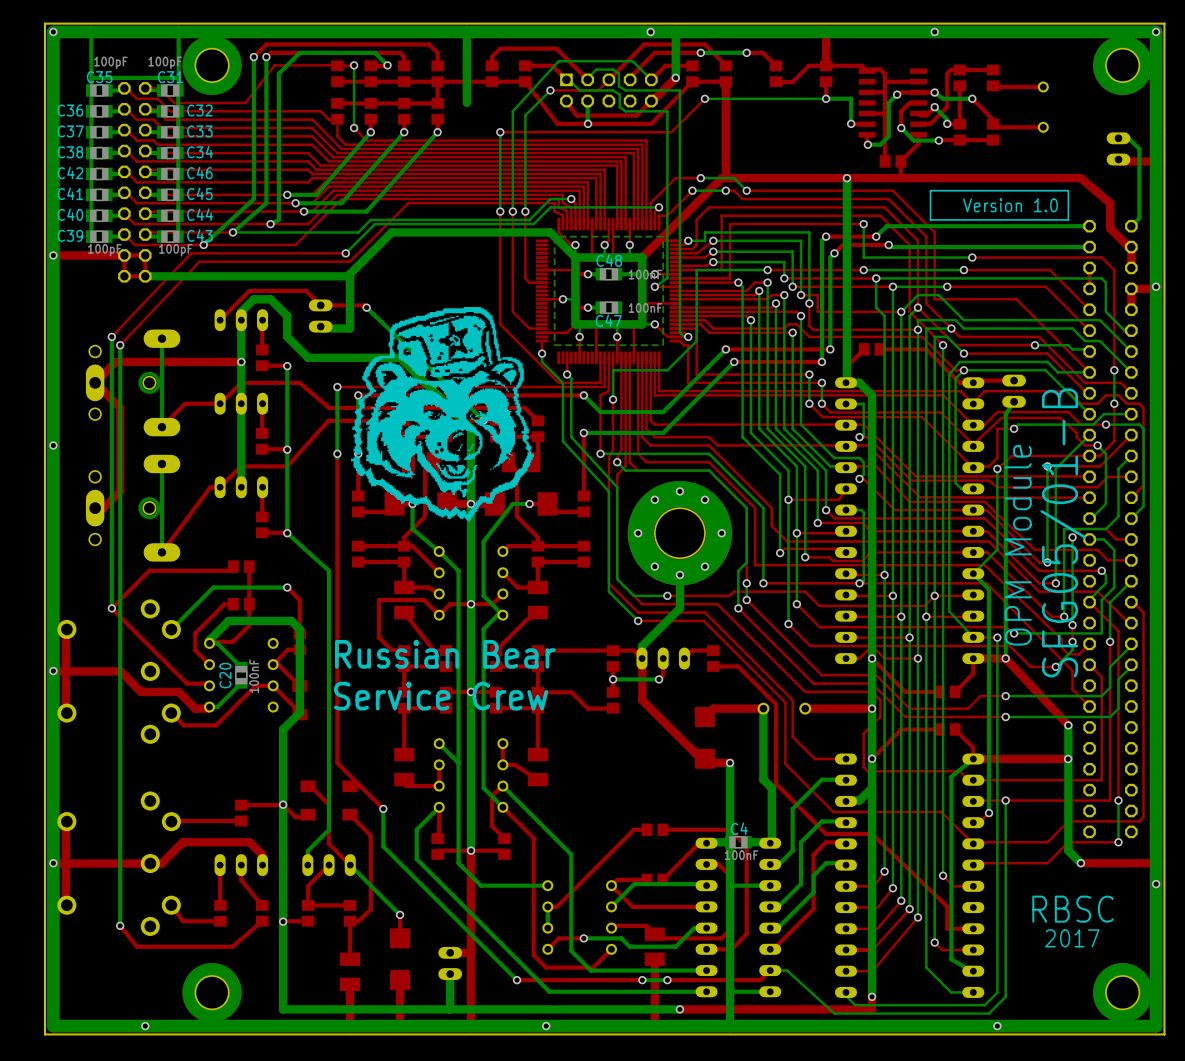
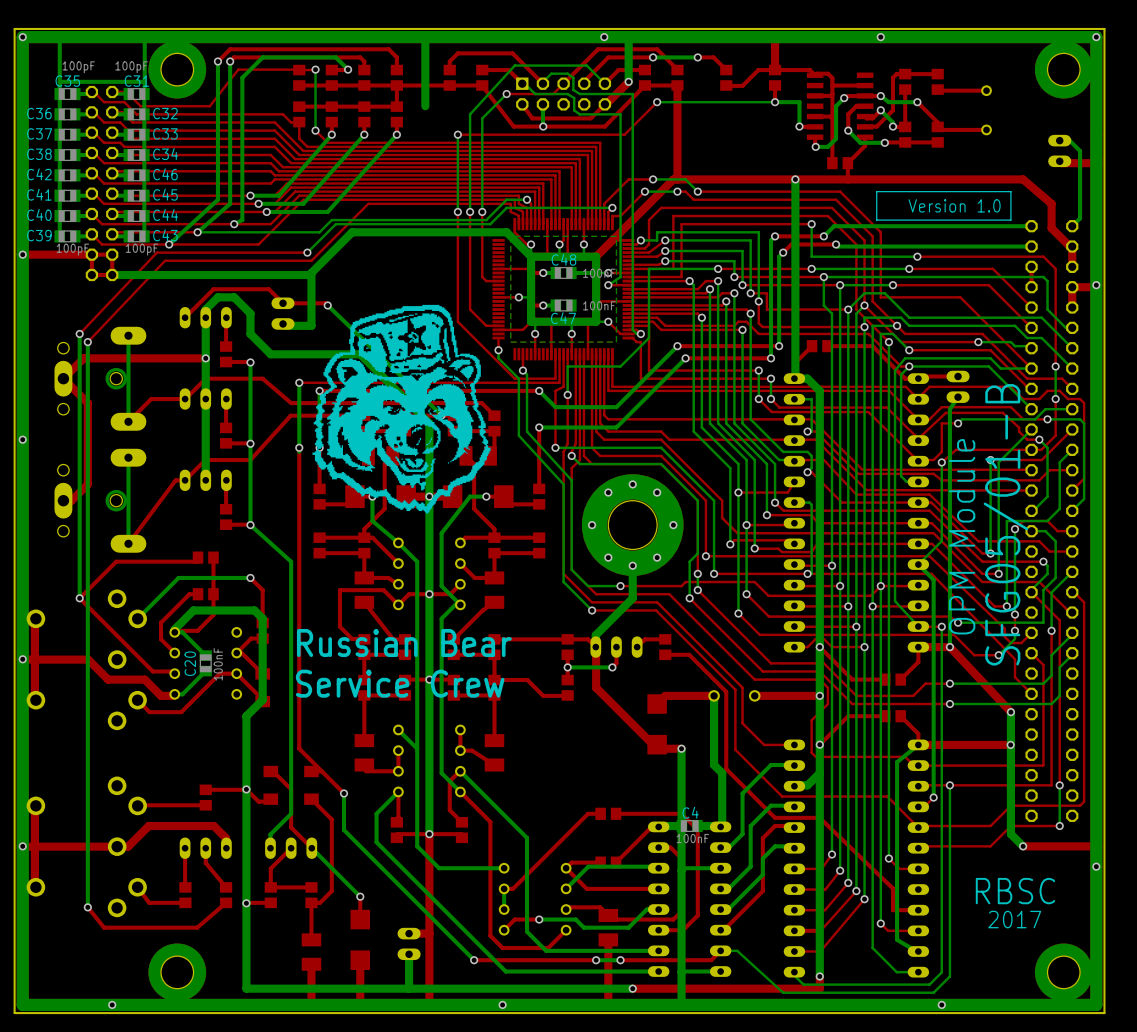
via: none -> (705, 556)

